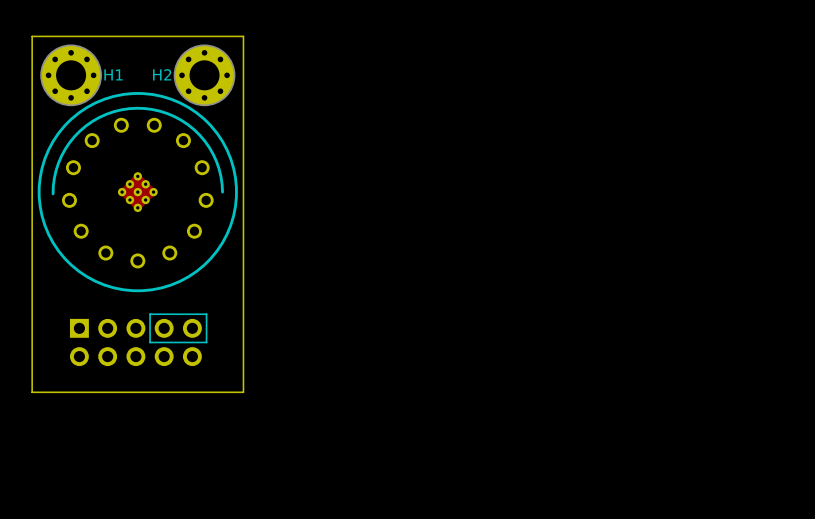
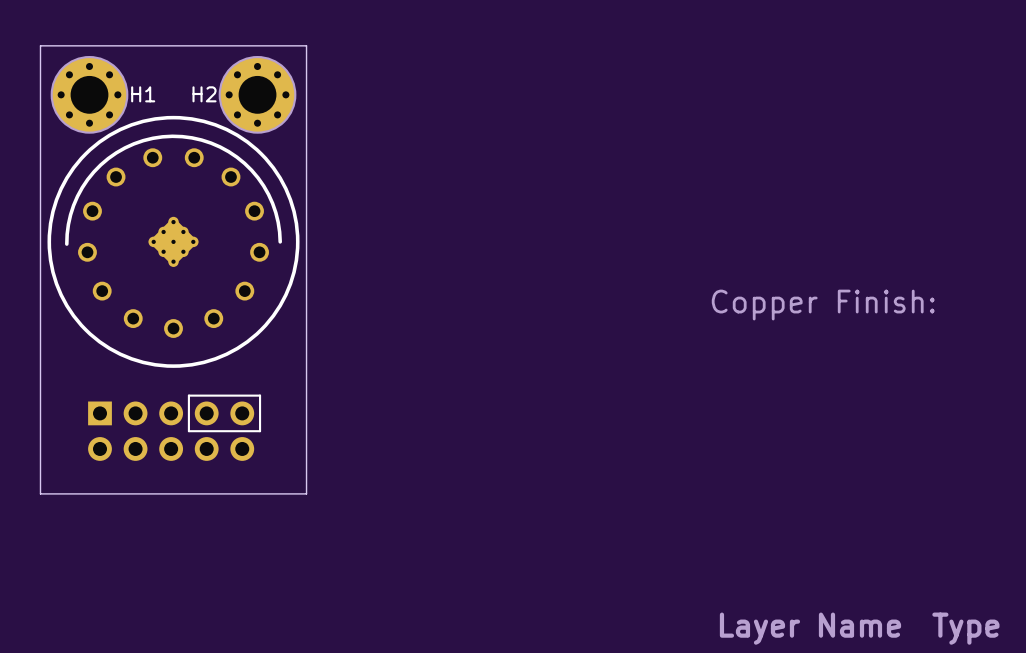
text: none -> Copper Finish: (823, 305)
text: none -> Layer Name (810, 628)
text: none -> Type (965, 628)

